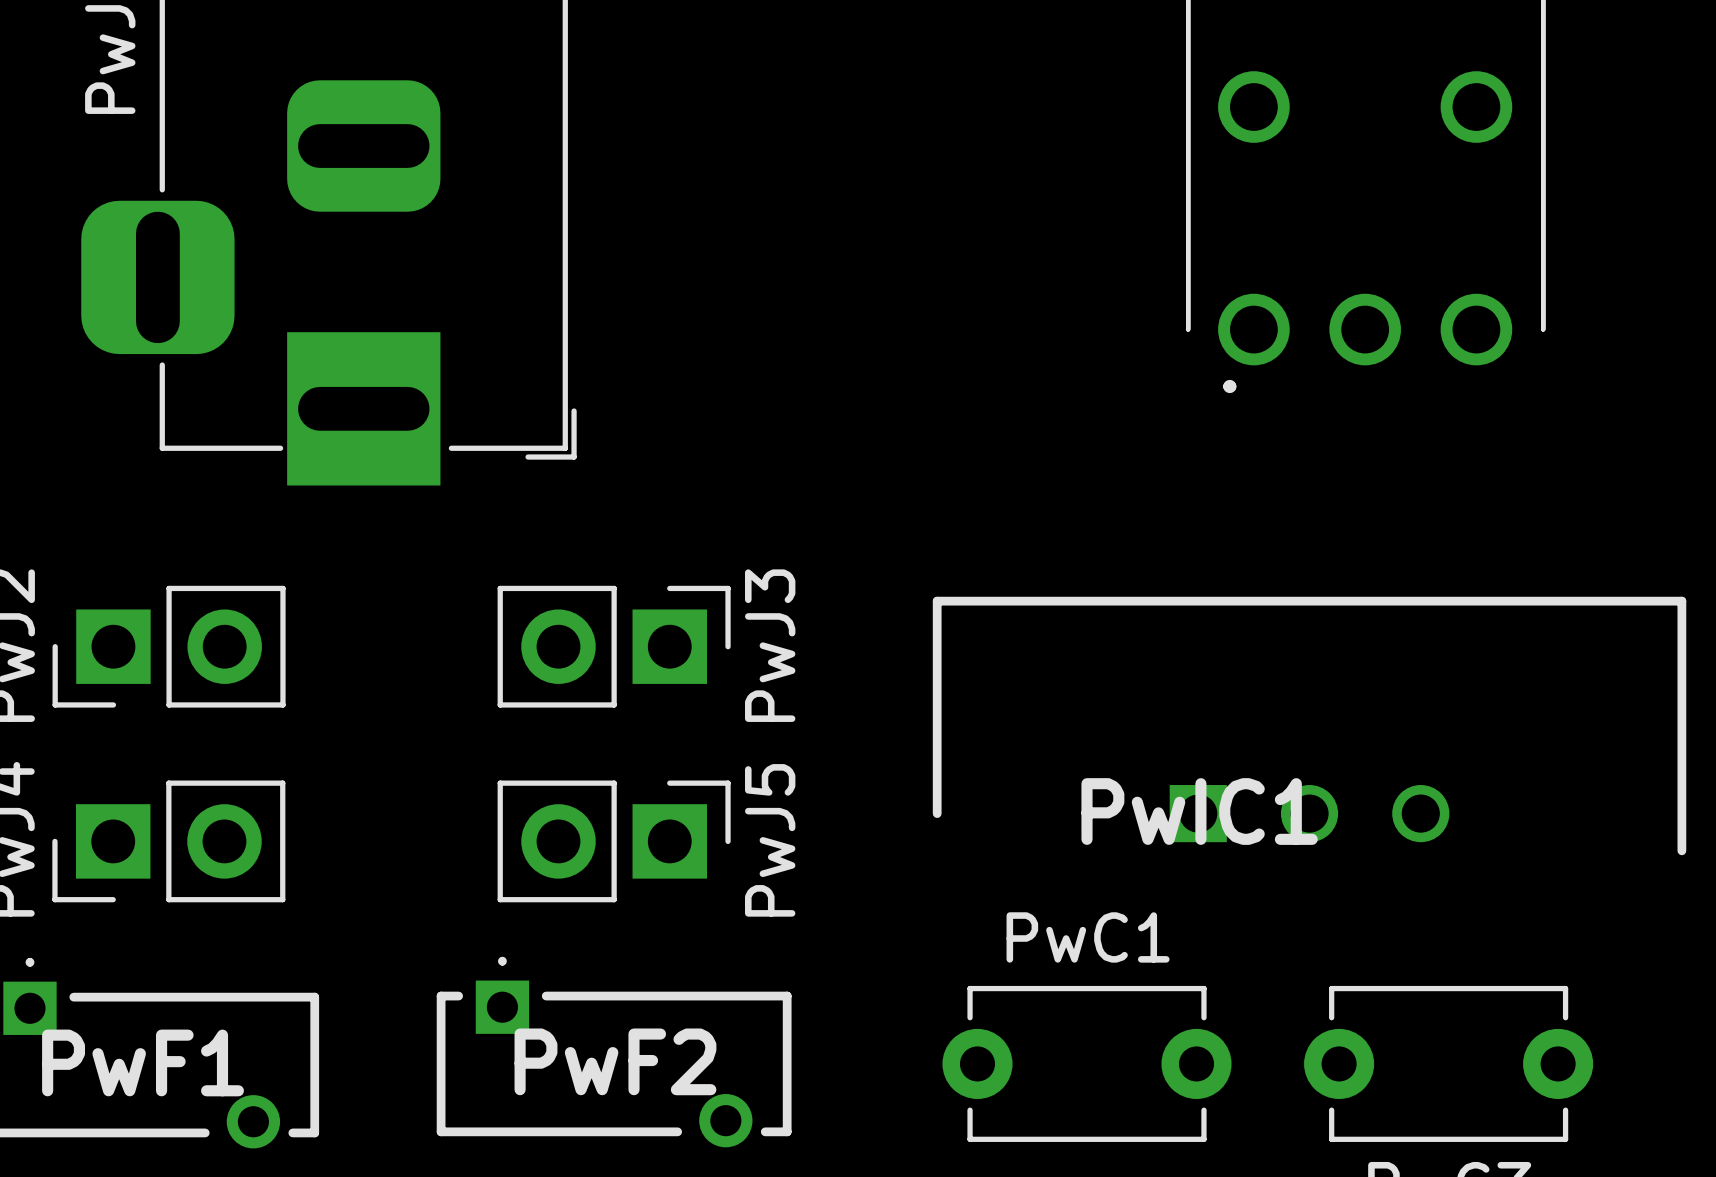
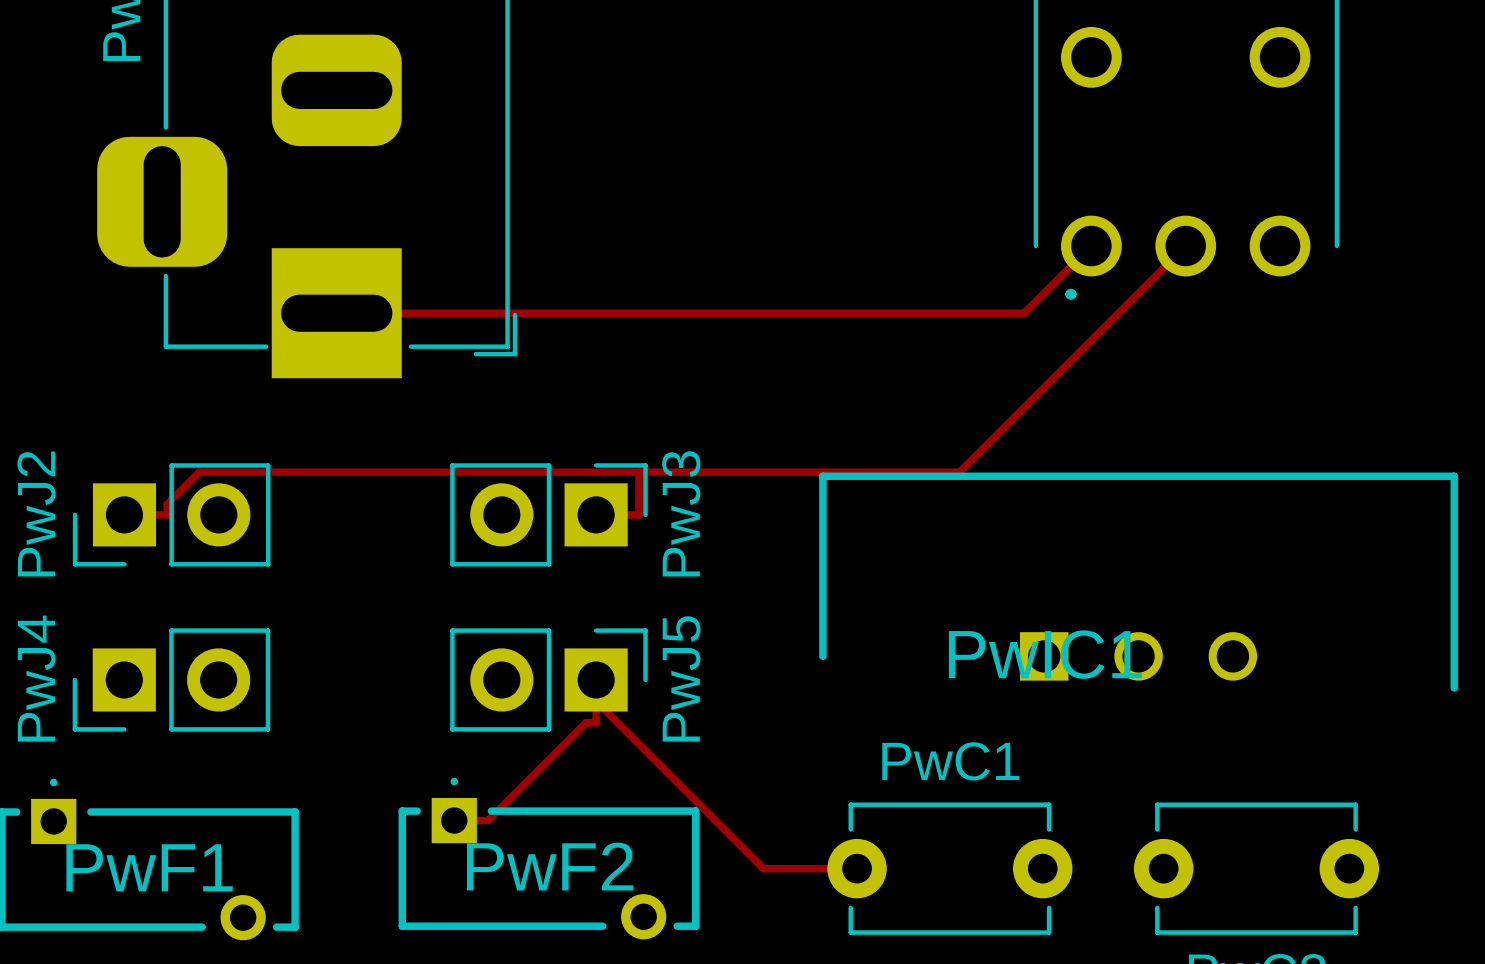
track: none -> (1091, 246) (1024, 313) (336, 313)
track: none -> (1185, 246) (959, 472) (199, 472) (167, 504) (167, 514) (124, 514)
track: none -> (640, 472) (638, 514) (596, 514)
track: none -> (596, 679) (596, 722) (585, 722) (488, 820) (454, 820)
track: none -> (596, 701) (763, 868) (857, 868)

